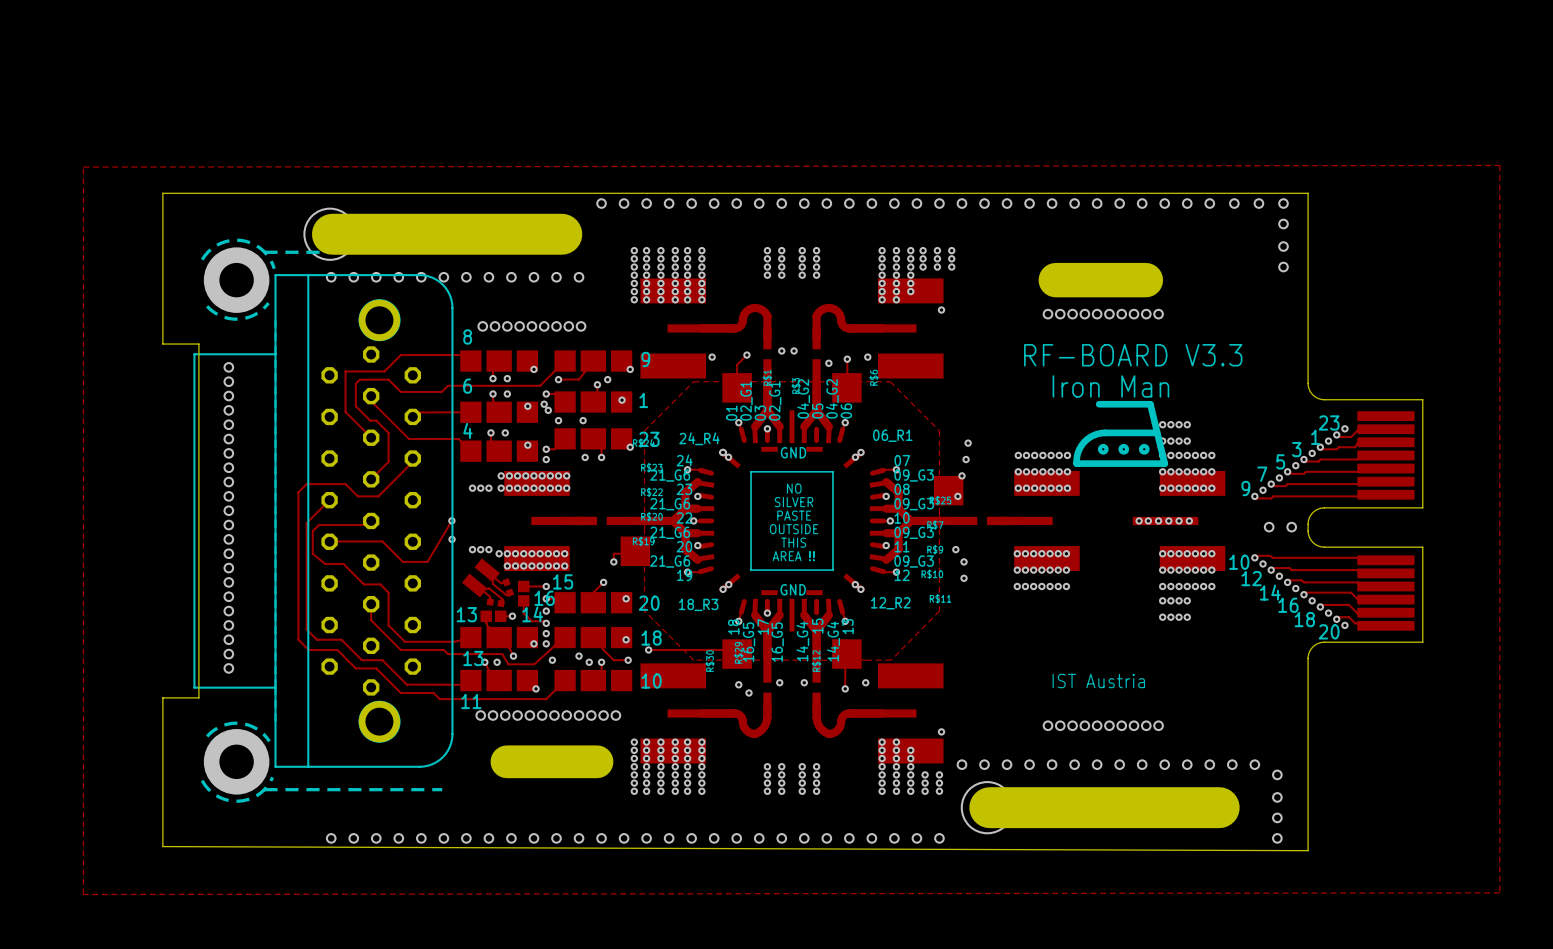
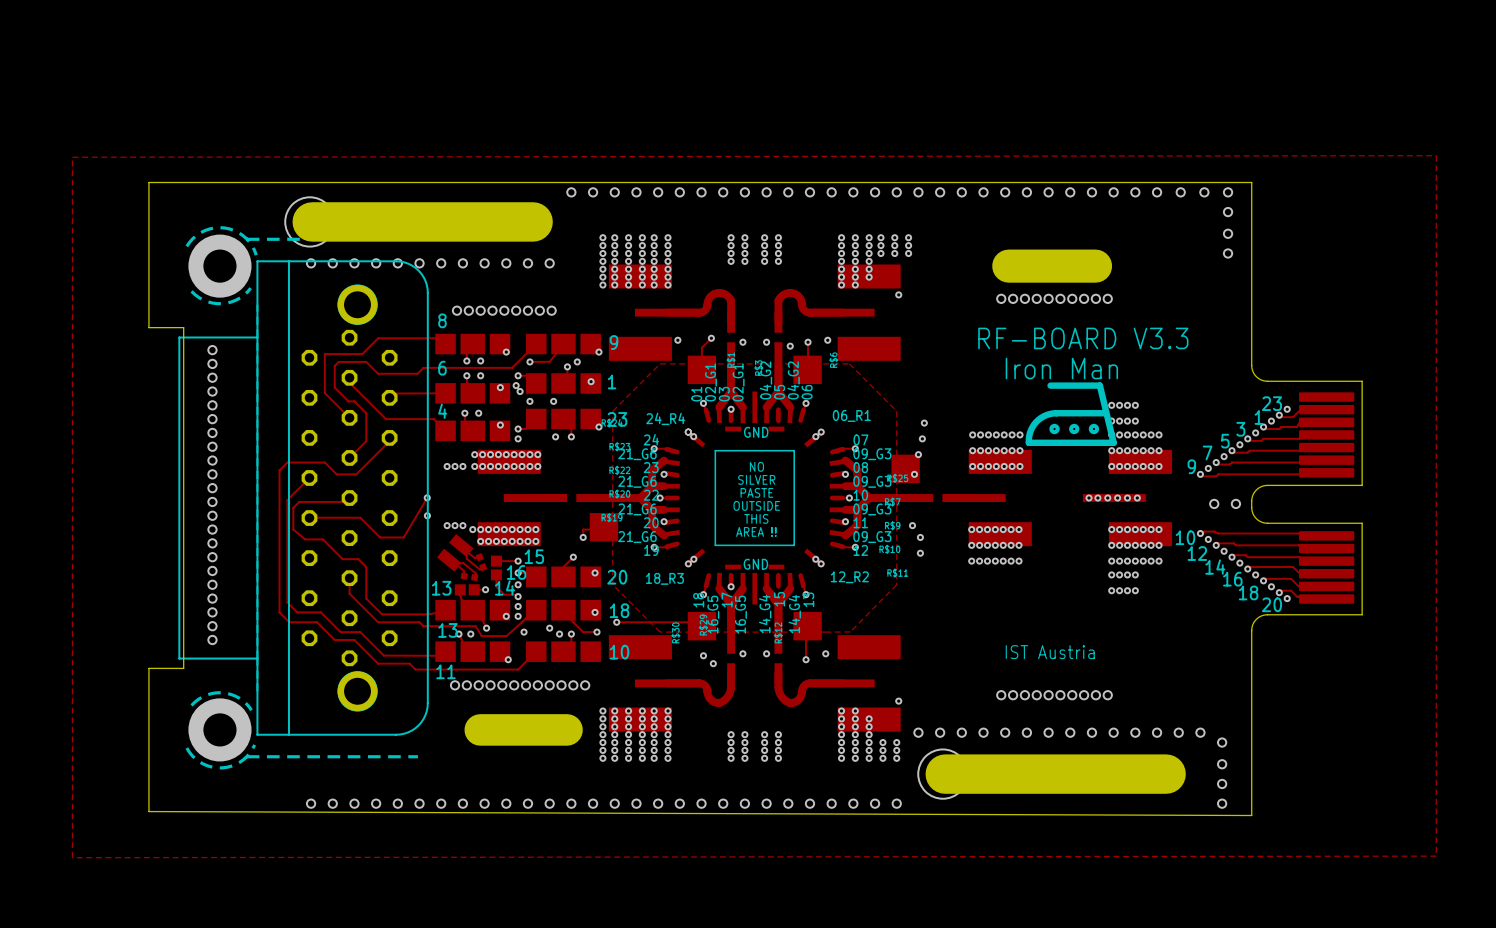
via: (781, 350) -> none
via: (794, 350) -> none
via: none -> (742, 342)
via: none -> (766, 342)

